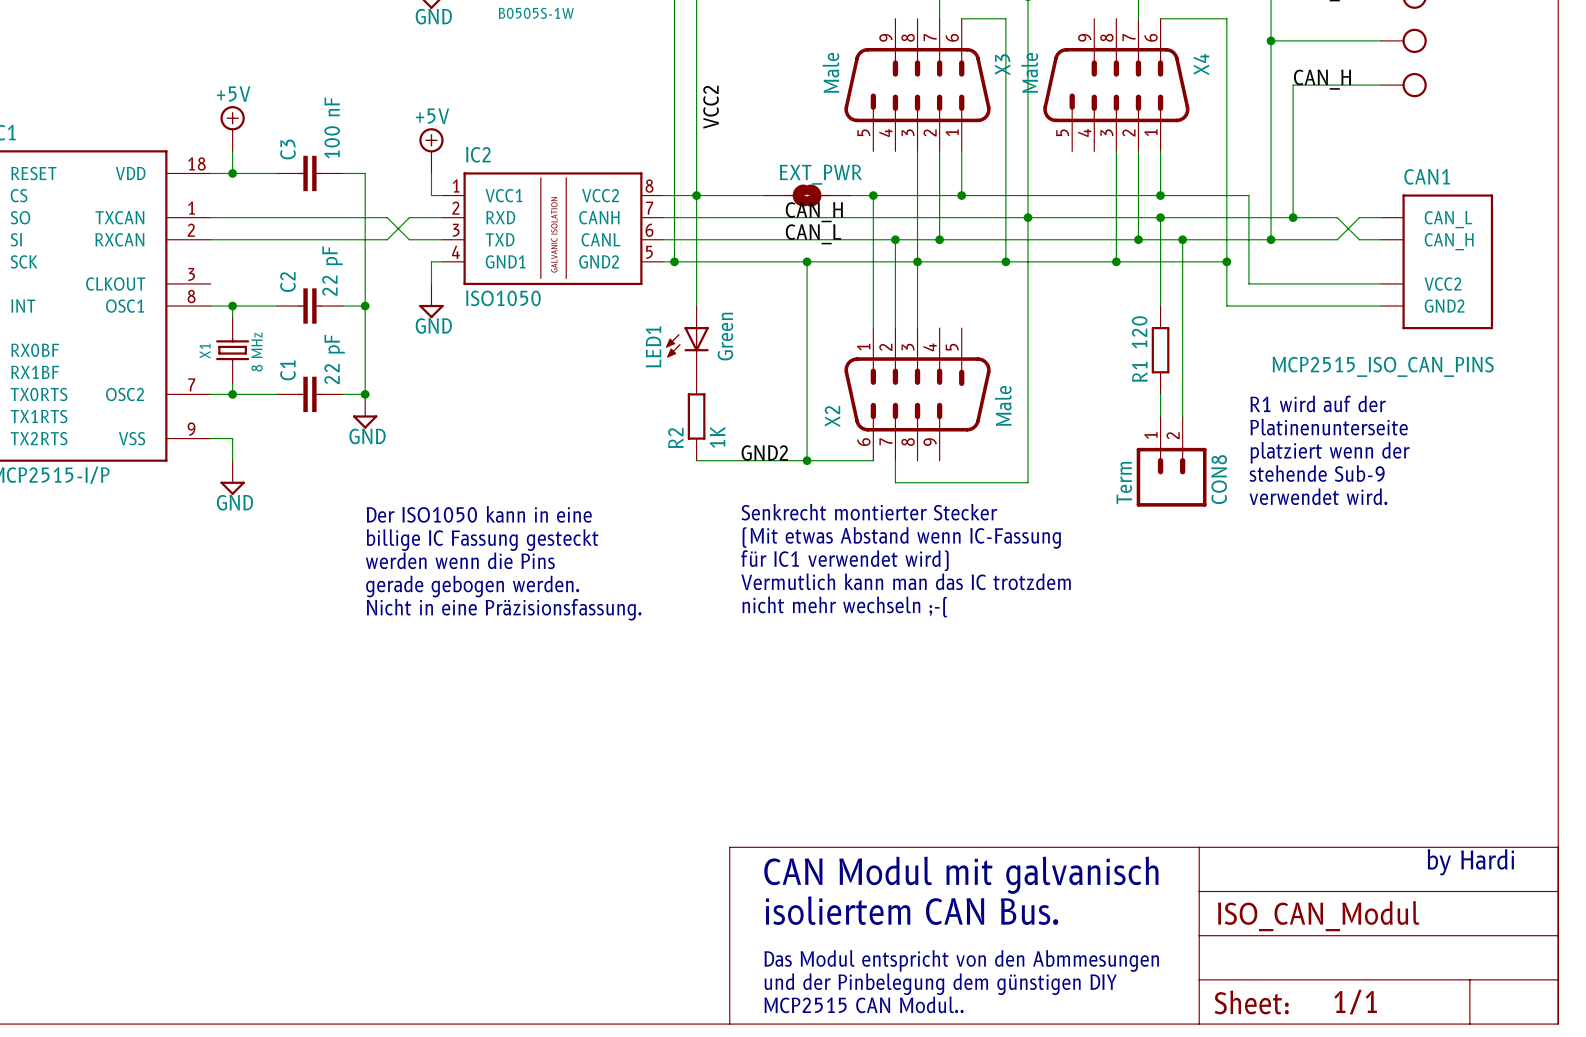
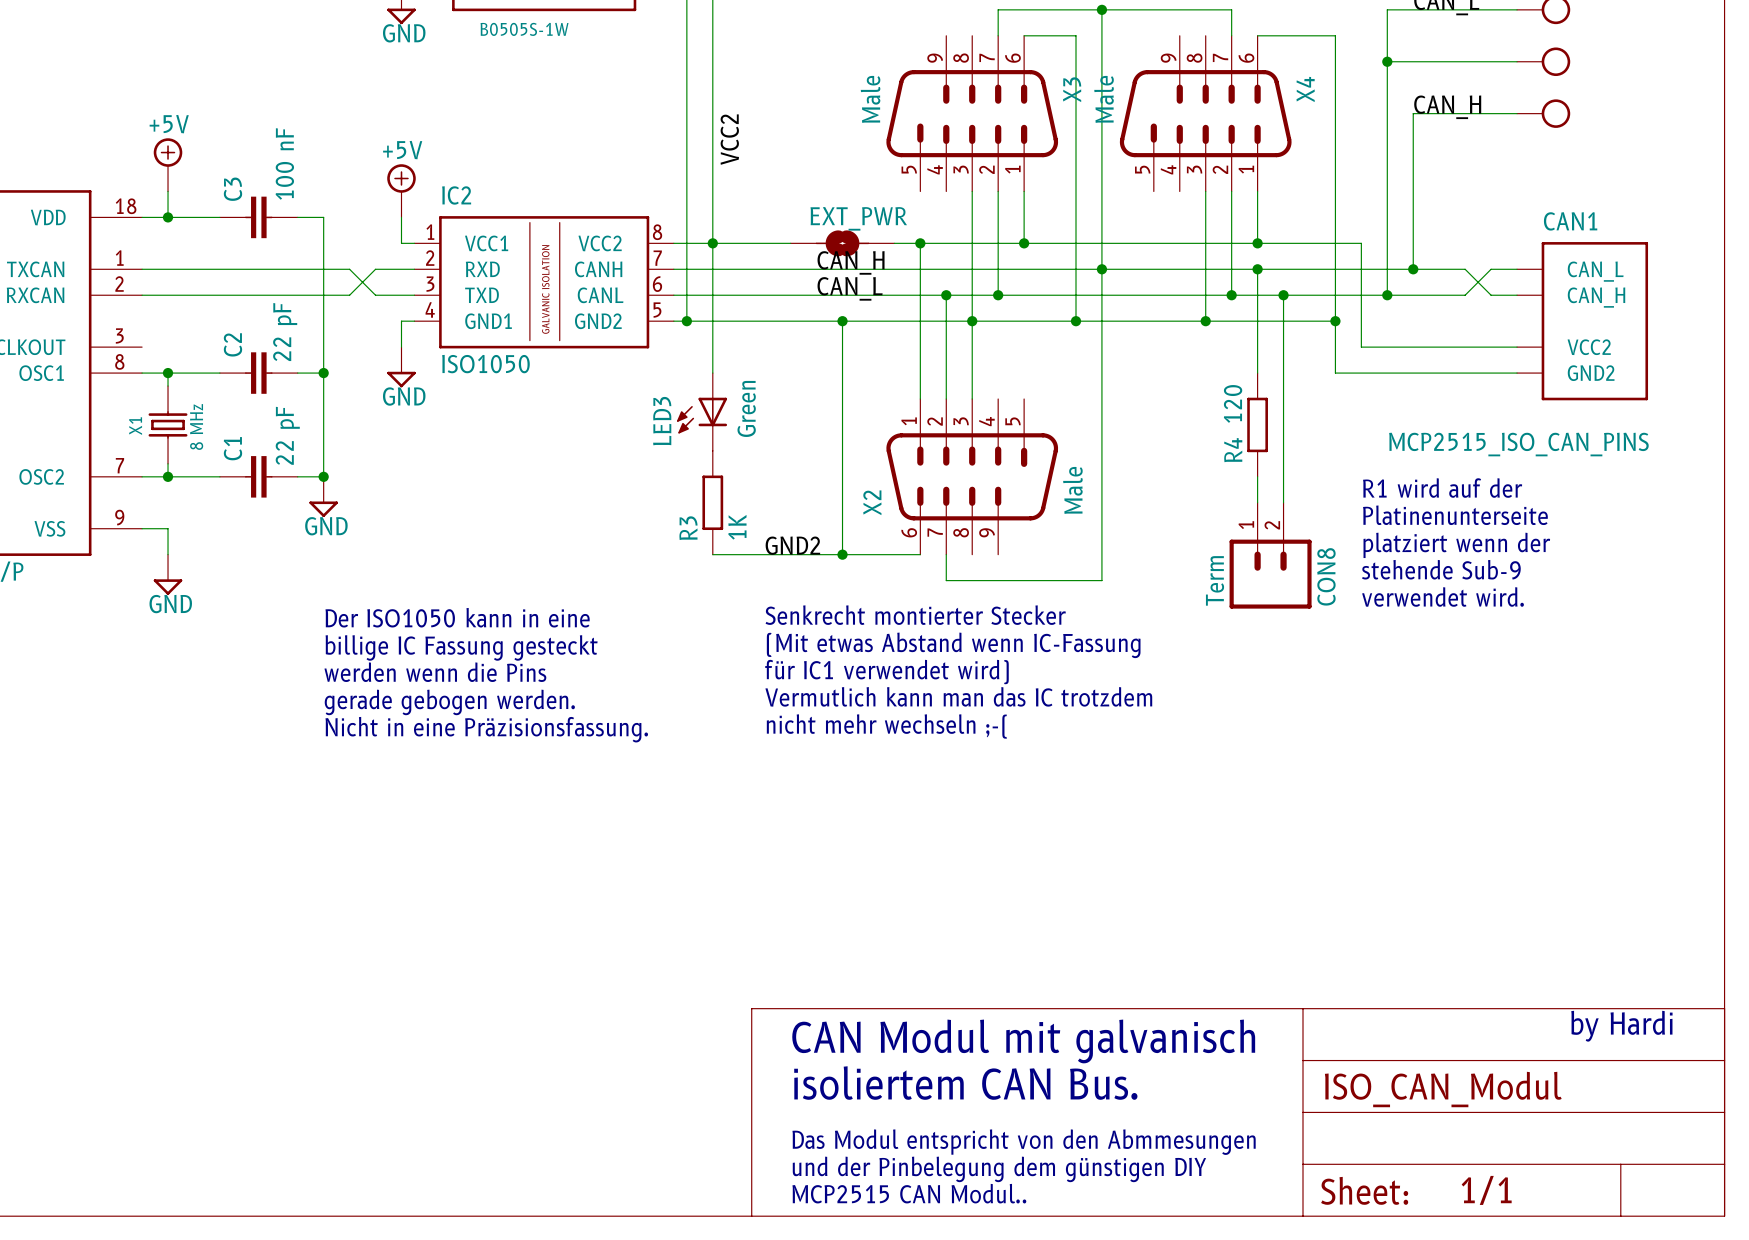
LED1 name: LED1 (653, 346) -> LED3 (662, 421)
R1 name: R1 (1139, 371) -> R4 (1233, 450)
R2 name: R2 (675, 438) -> R3 (688, 528)

